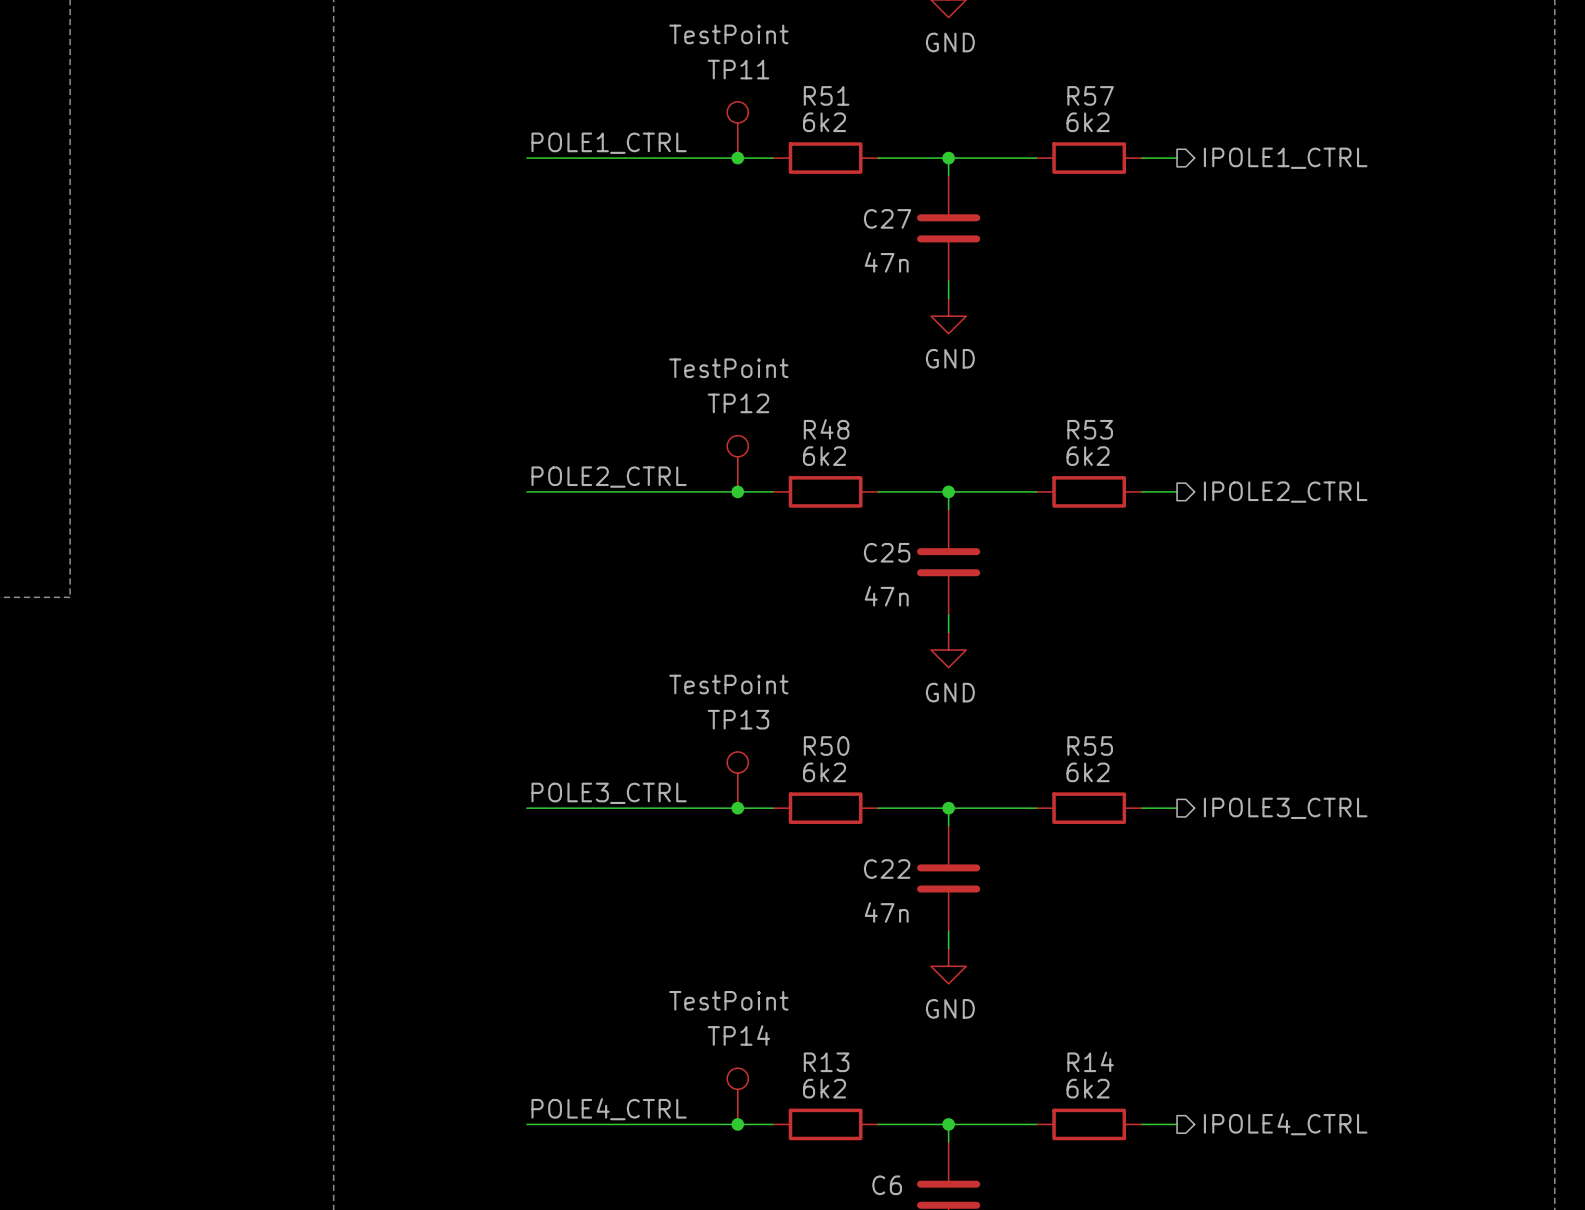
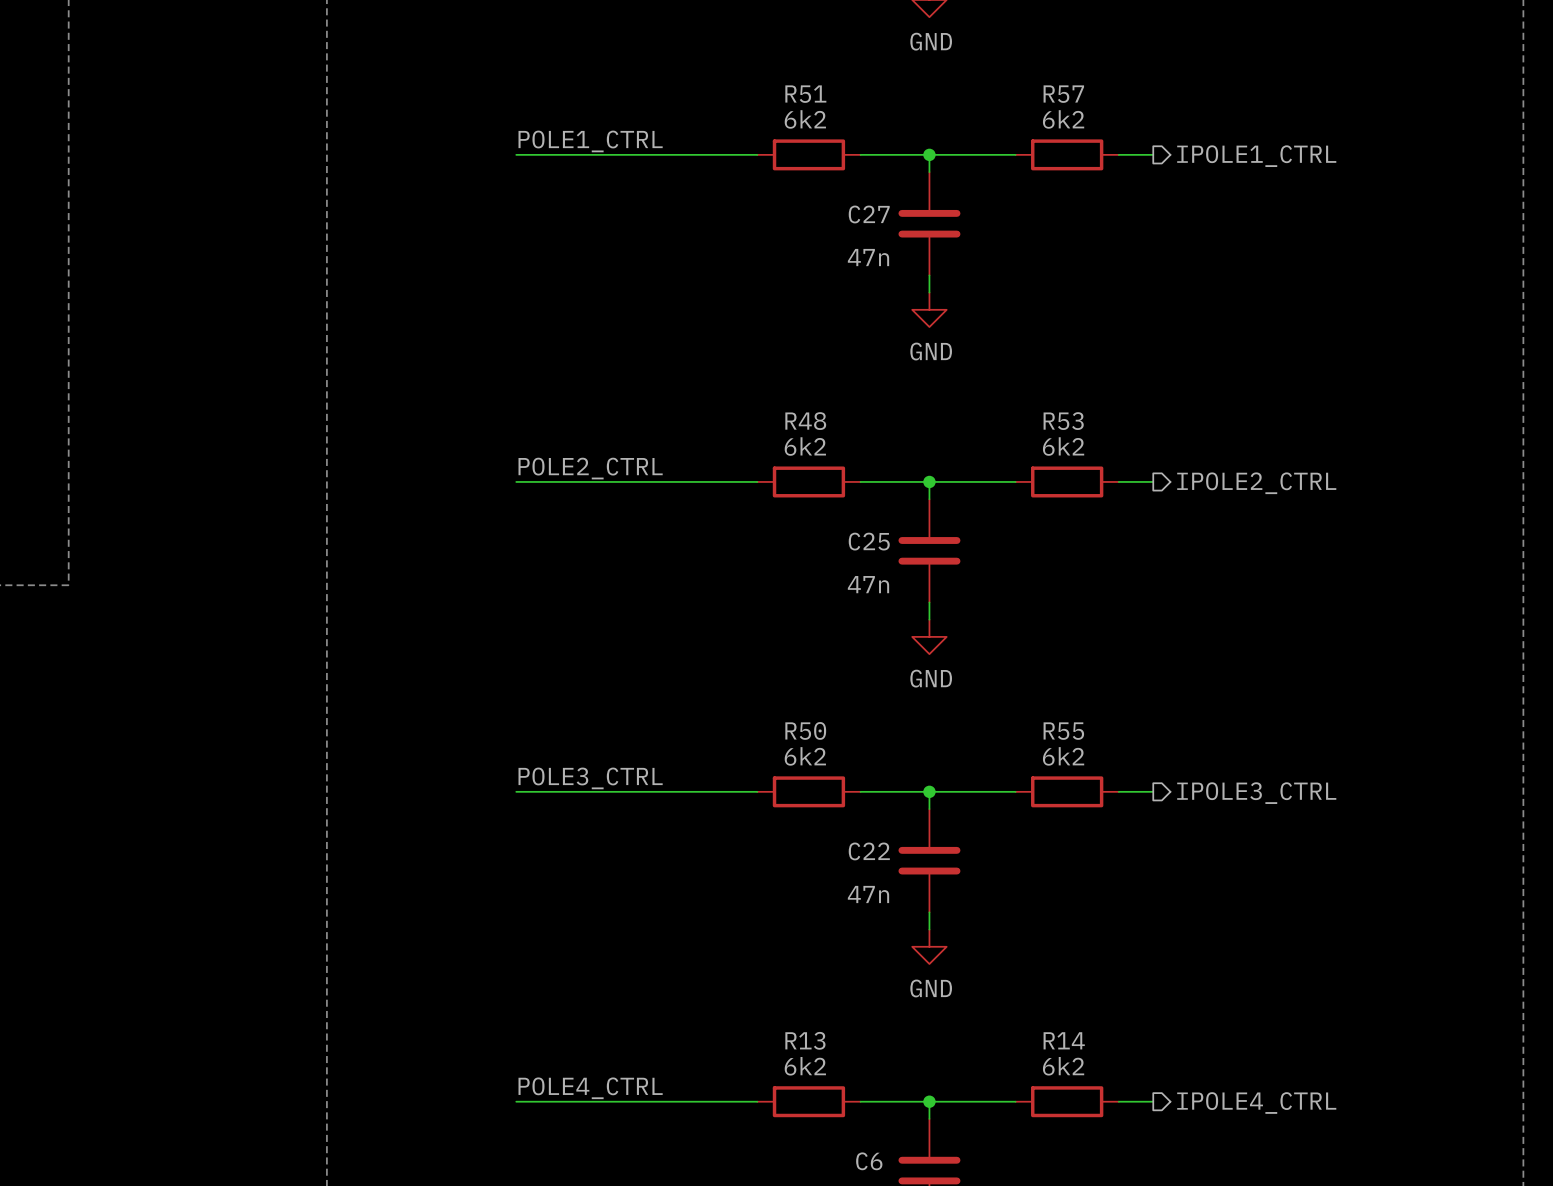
TP11: TestPoint (737, 129) -> none
junction: (737, 158) -> none
TP12: TestPoint (737, 463) -> none
junction: (737, 491) -> none
TP13: TestPoint (737, 780) -> none
junction: (737, 808) -> none
TP14: TestPoint (737, 1096) -> none
junction: (737, 1124) -> none

